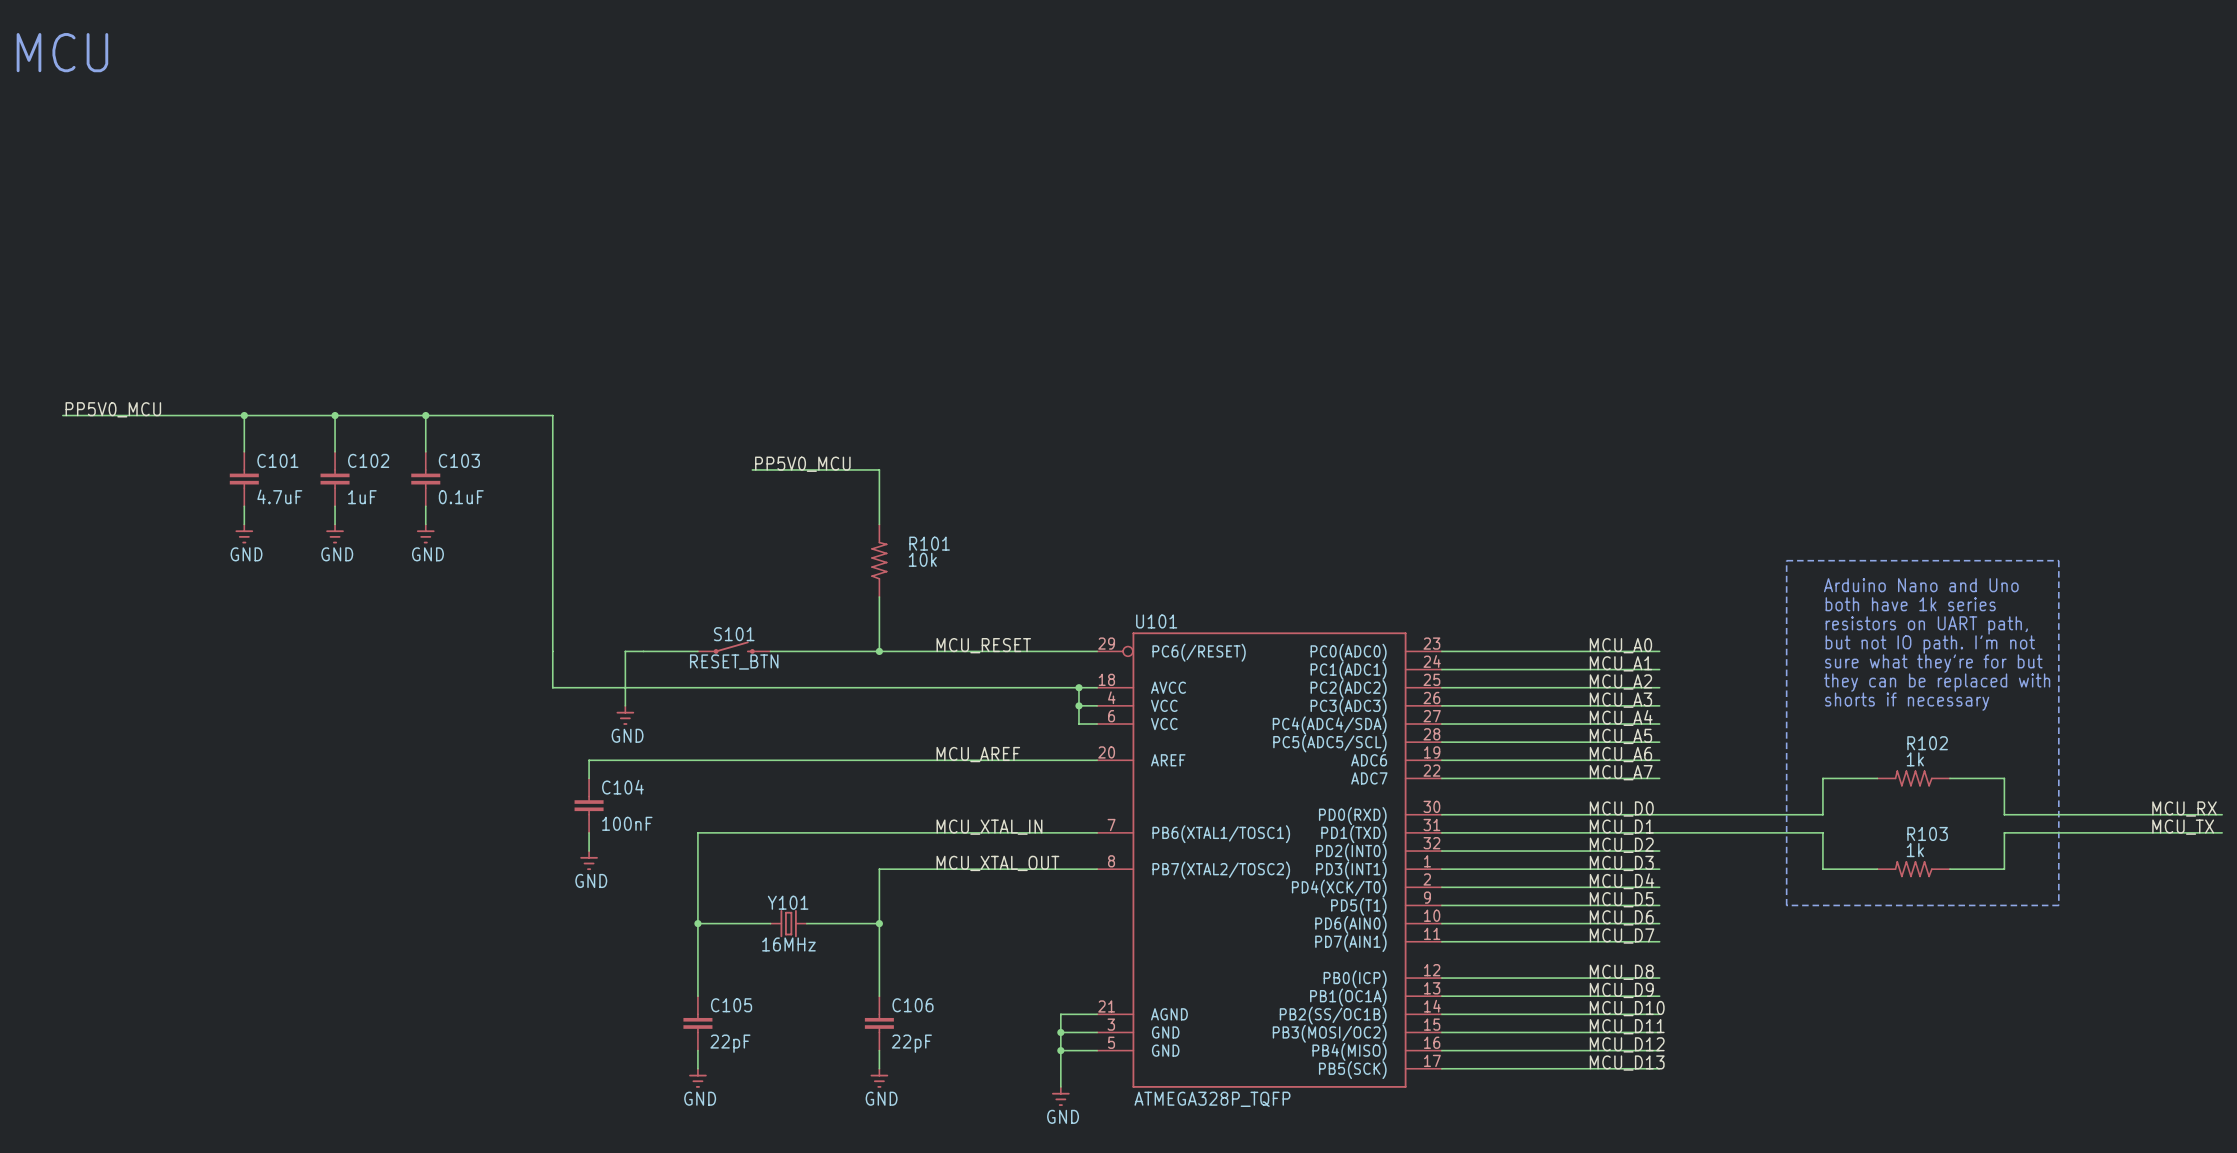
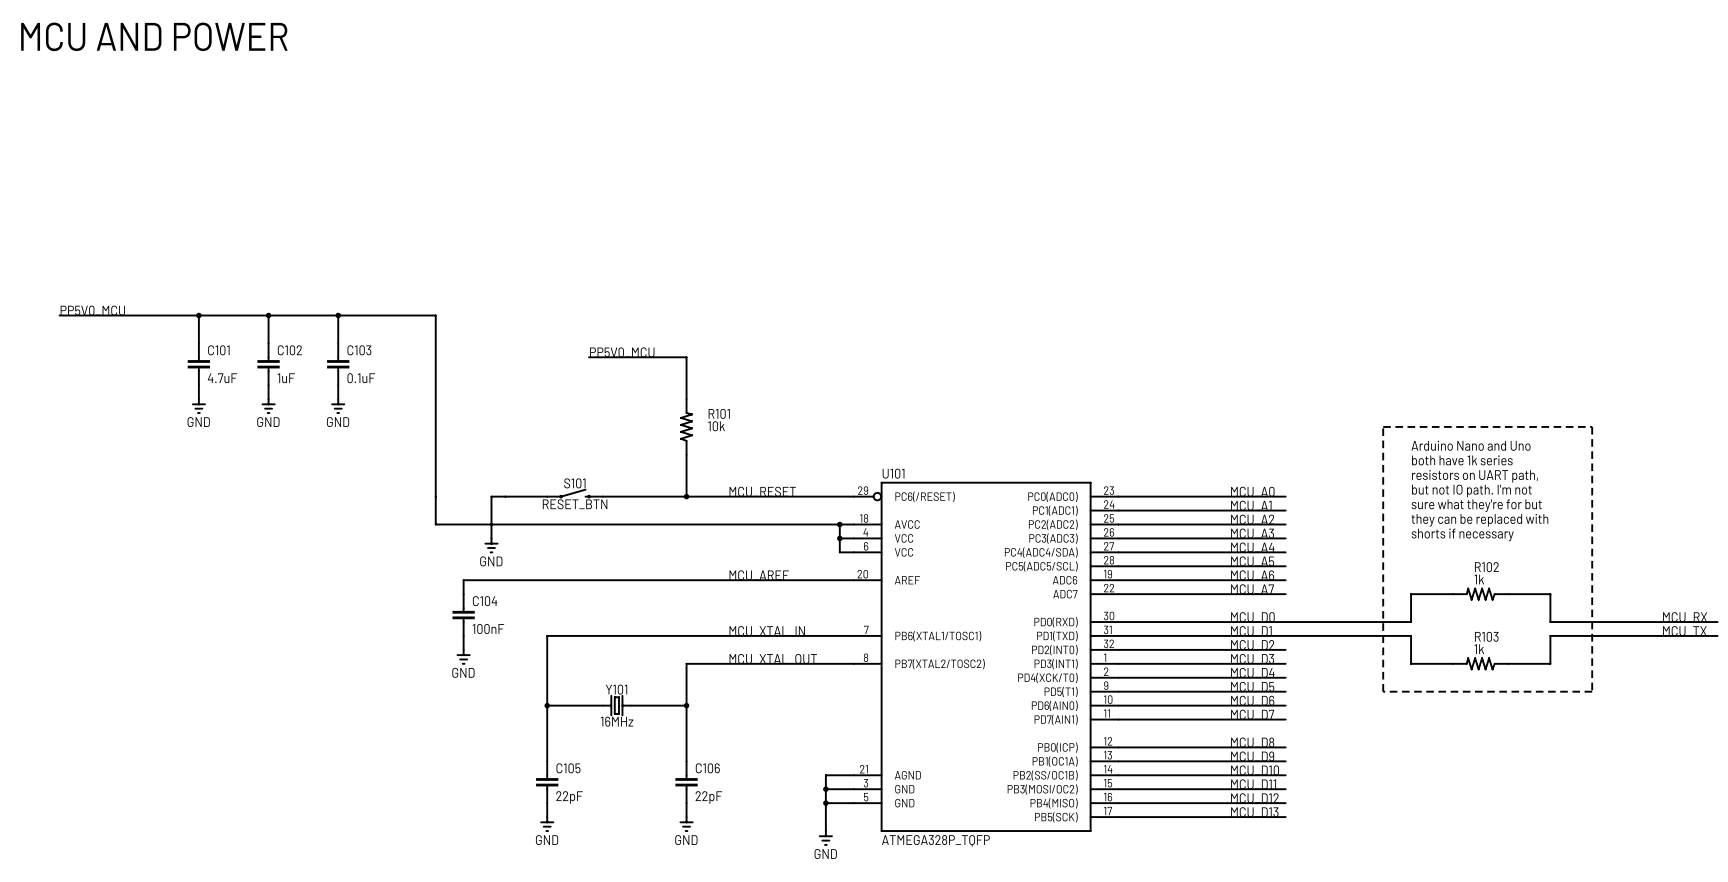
text: MCU (62, 52) -> MCU AND POWER (154, 36)

